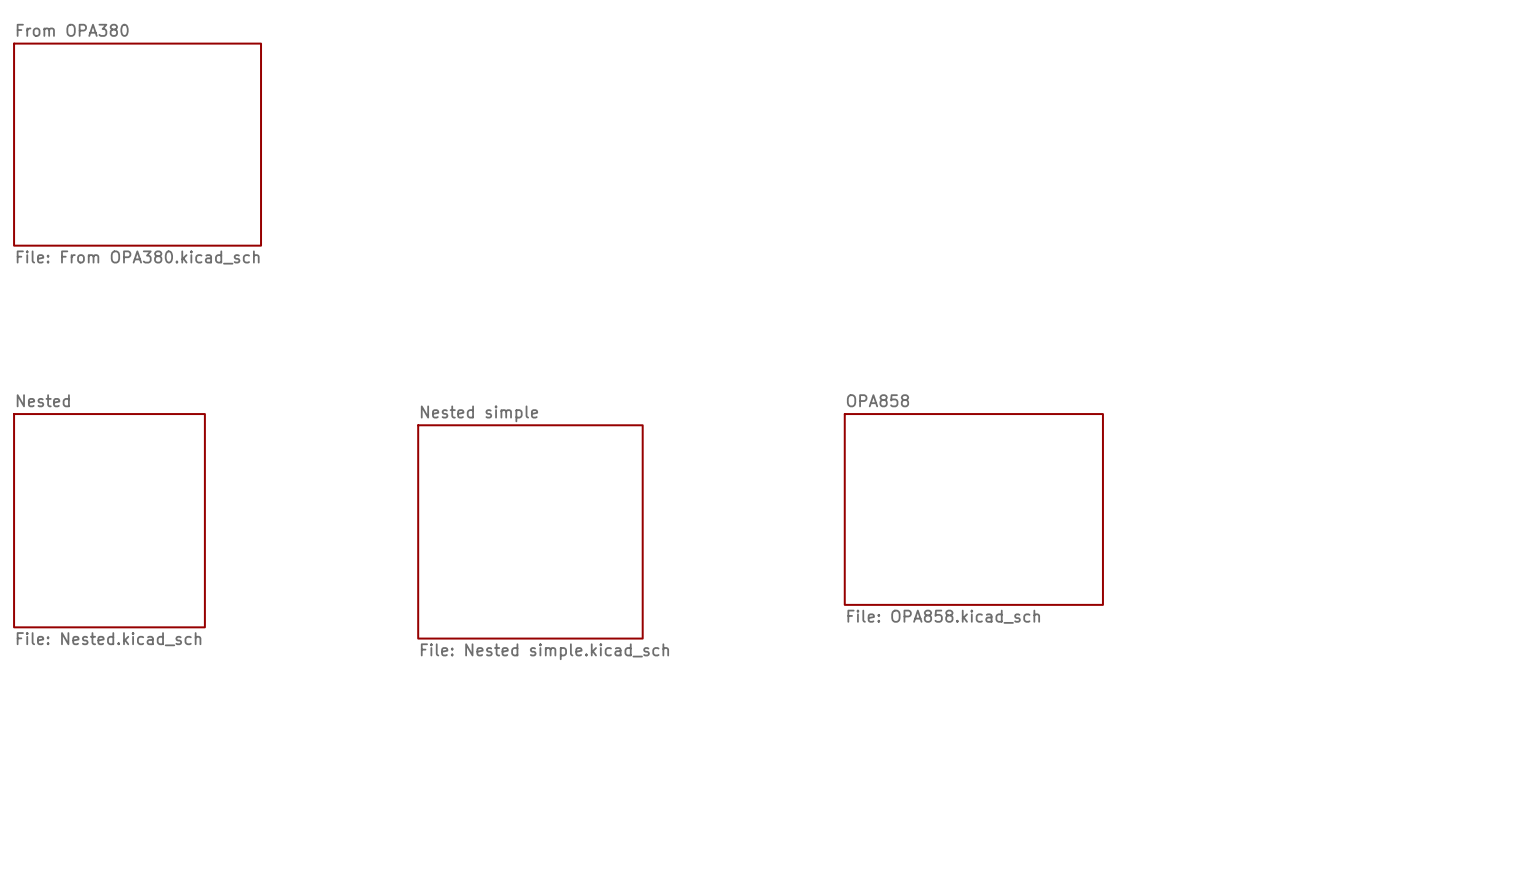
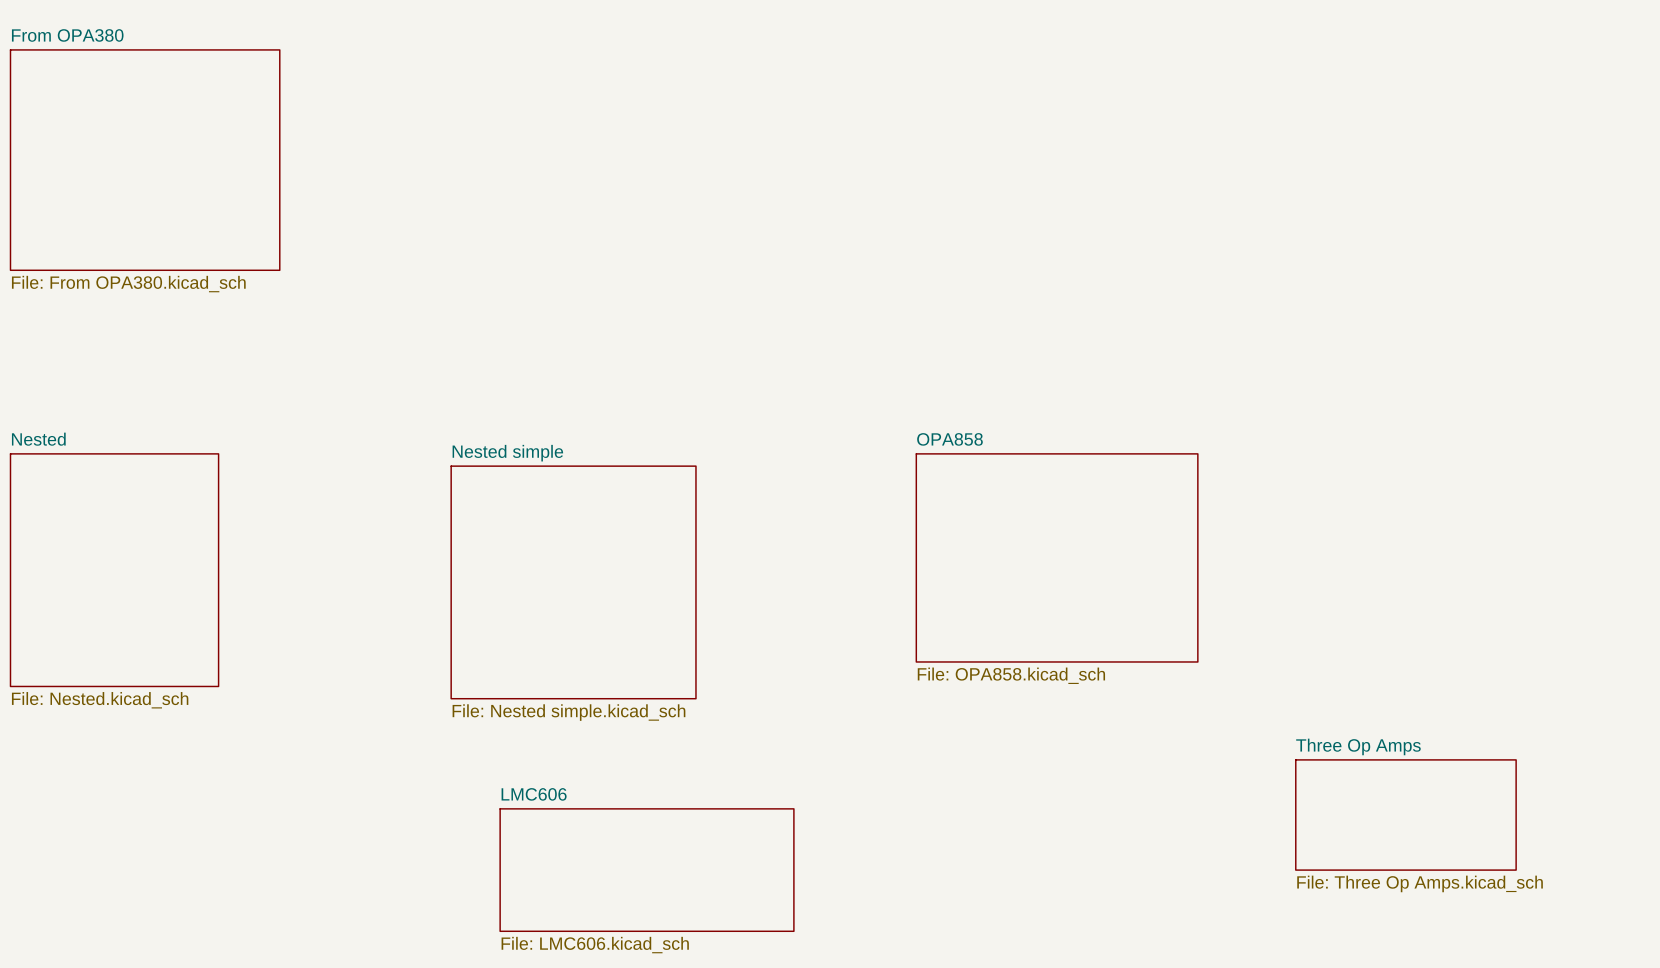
sheet Three Op Amps: none -> File: Three Op Amps.kicad_sch (1405, 815)
sheet LMC606: none -> File: LMC606.kicad_sch (647, 870)

